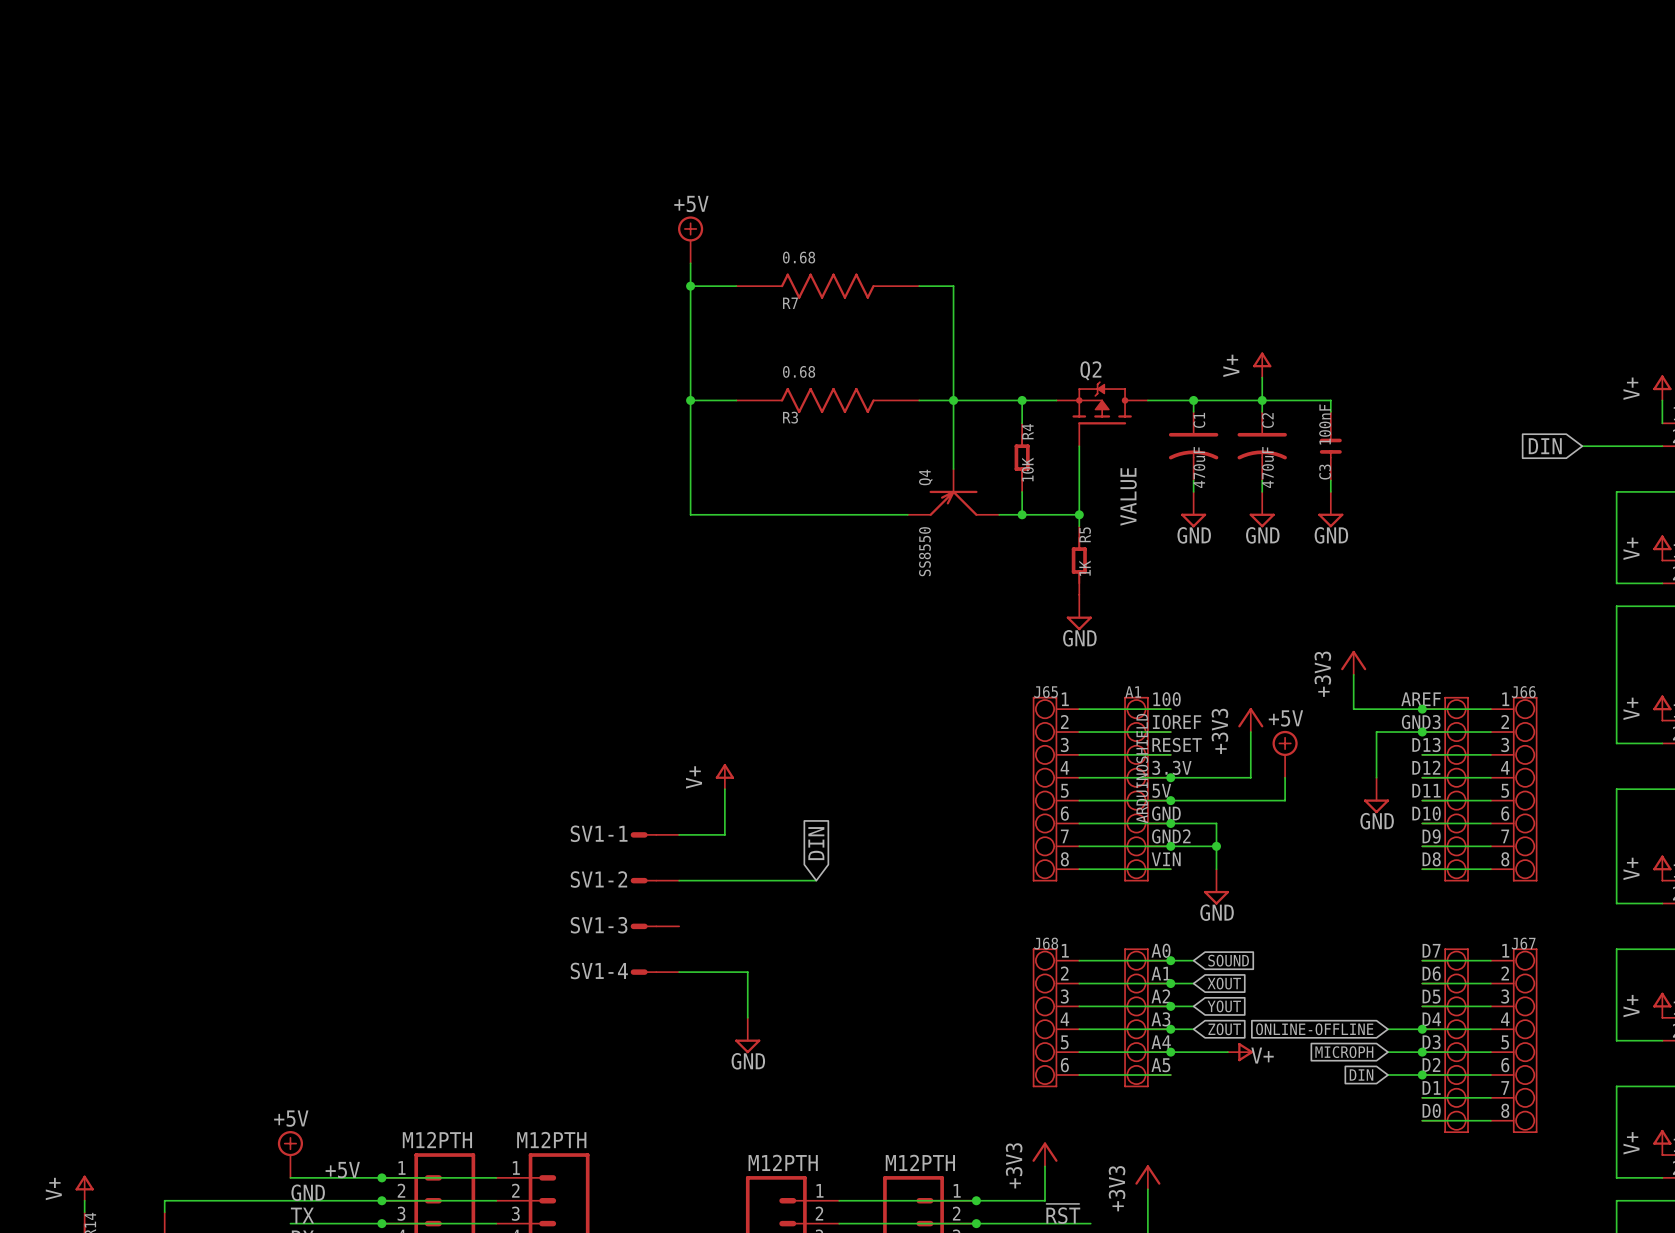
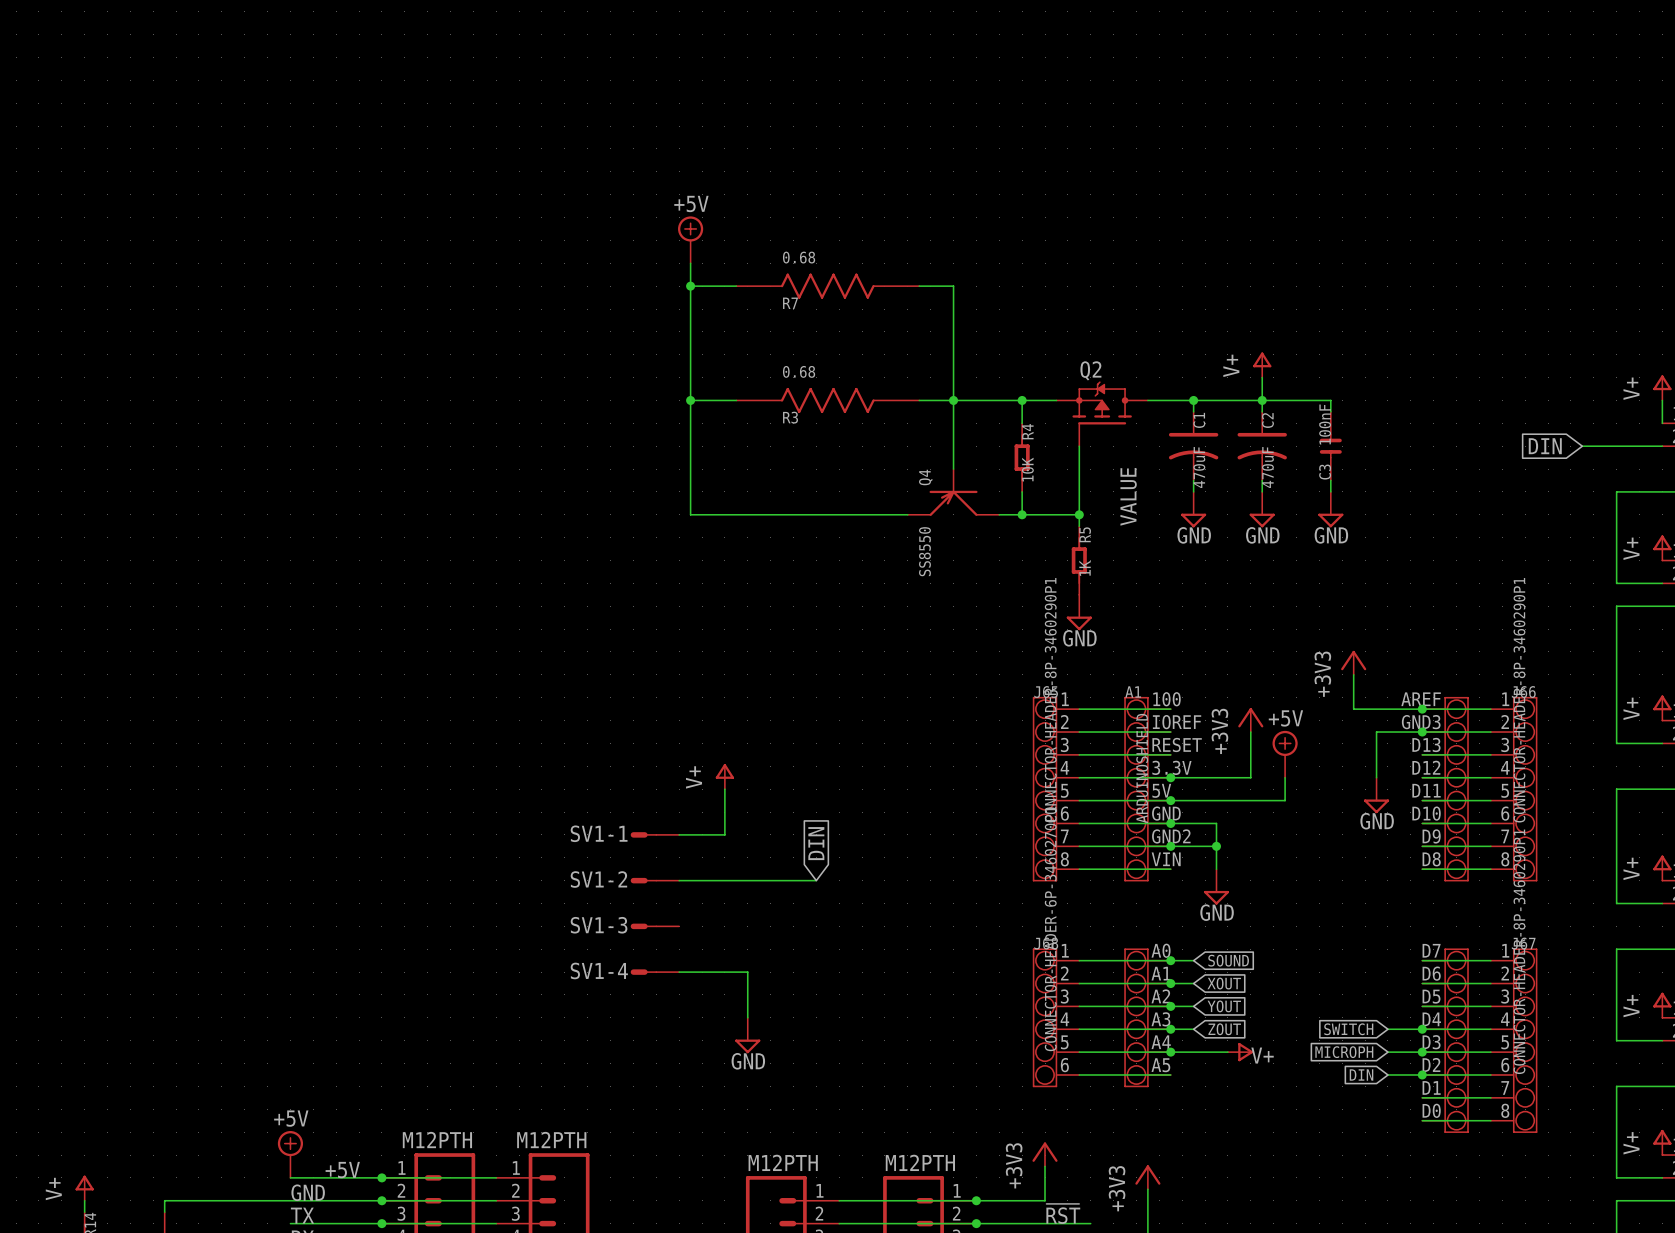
J65 value: none -> CONNECTOR-HEADER-8P-3460290P1 (1050, 700)
J66 value: none -> CONNECTOR-HEADER-8P-3460290P1 (1519, 700)
J68 value: none -> CONNECTOR-HEADER-6P-3460270P1 (1050, 928)
J67 value: none -> CONNECTOR-HEADER-8P-3460290P1 (1519, 951)
global label: ONLINE-OFFLINE (1314, 1029) -> SWITCH (1348, 1029)

